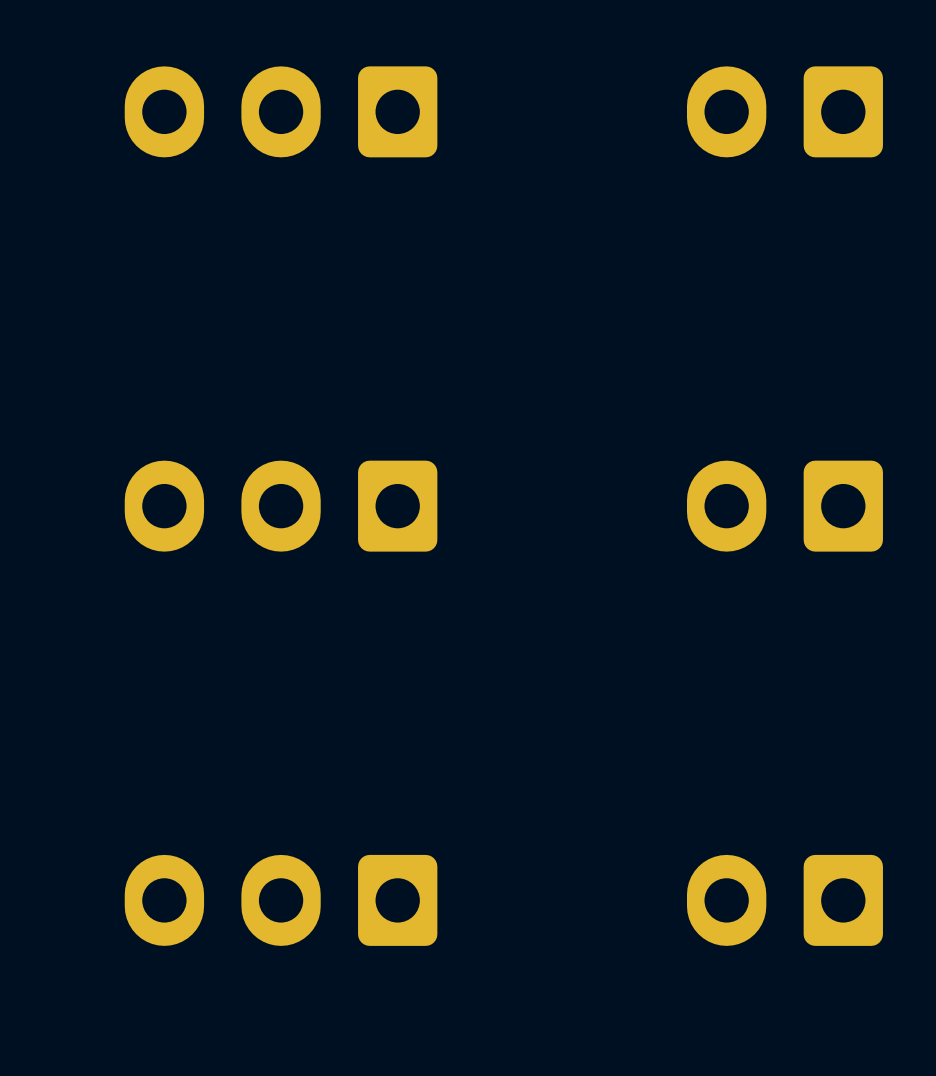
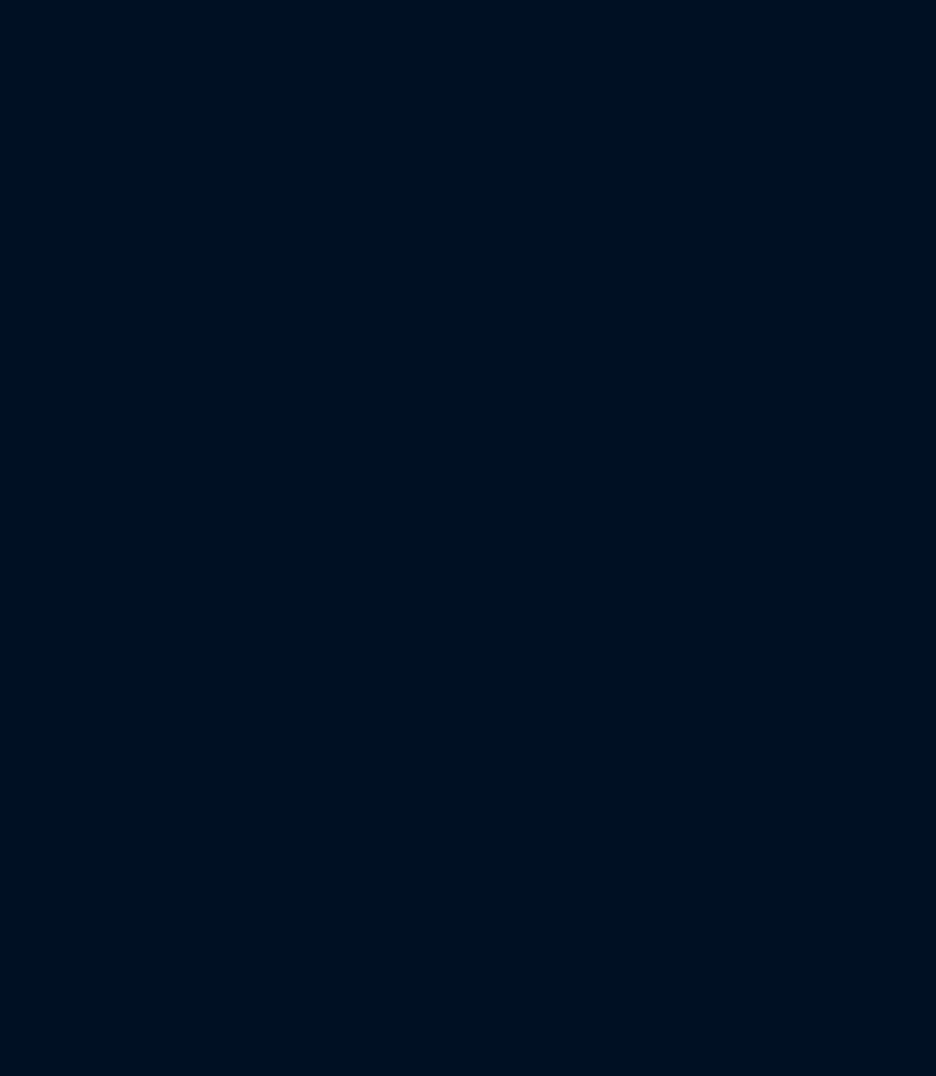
part: (281, 111) -> none
part: (784, 111) -> none
part: (281, 506) -> none
part: (784, 506) -> none
part: (281, 900) -> none
part: (784, 900) -> none

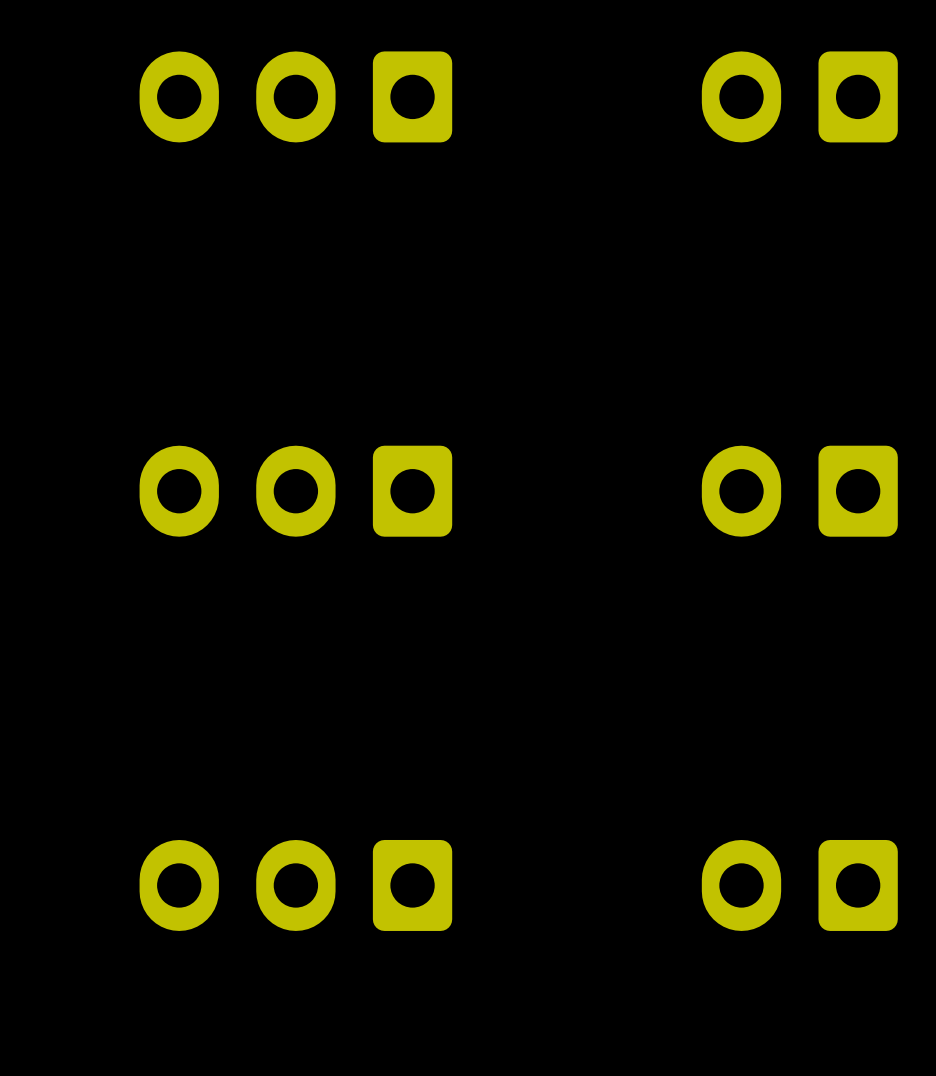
part: none -> (295, 96)
part: none -> (799, 96)
part: none -> (295, 491)
part: none -> (799, 491)
part: none -> (295, 885)
part: none -> (799, 885)

